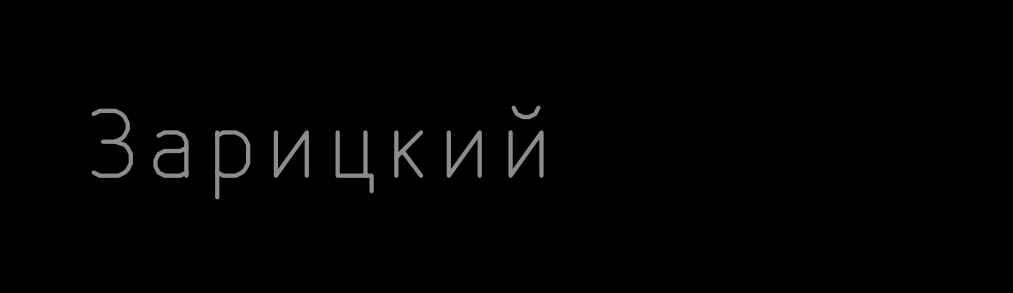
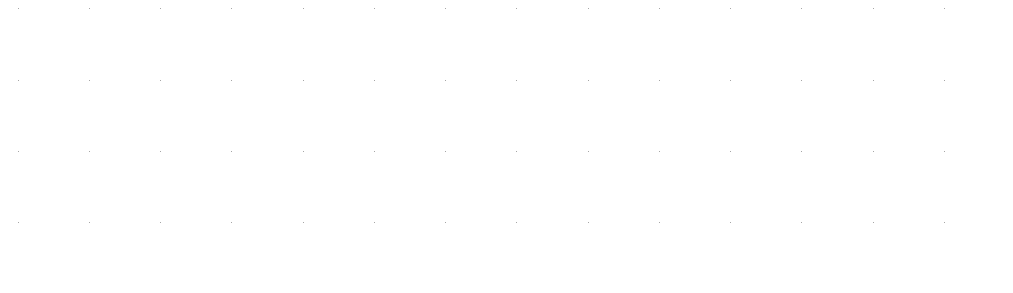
text: Зарицкий (317, 152) -> none

